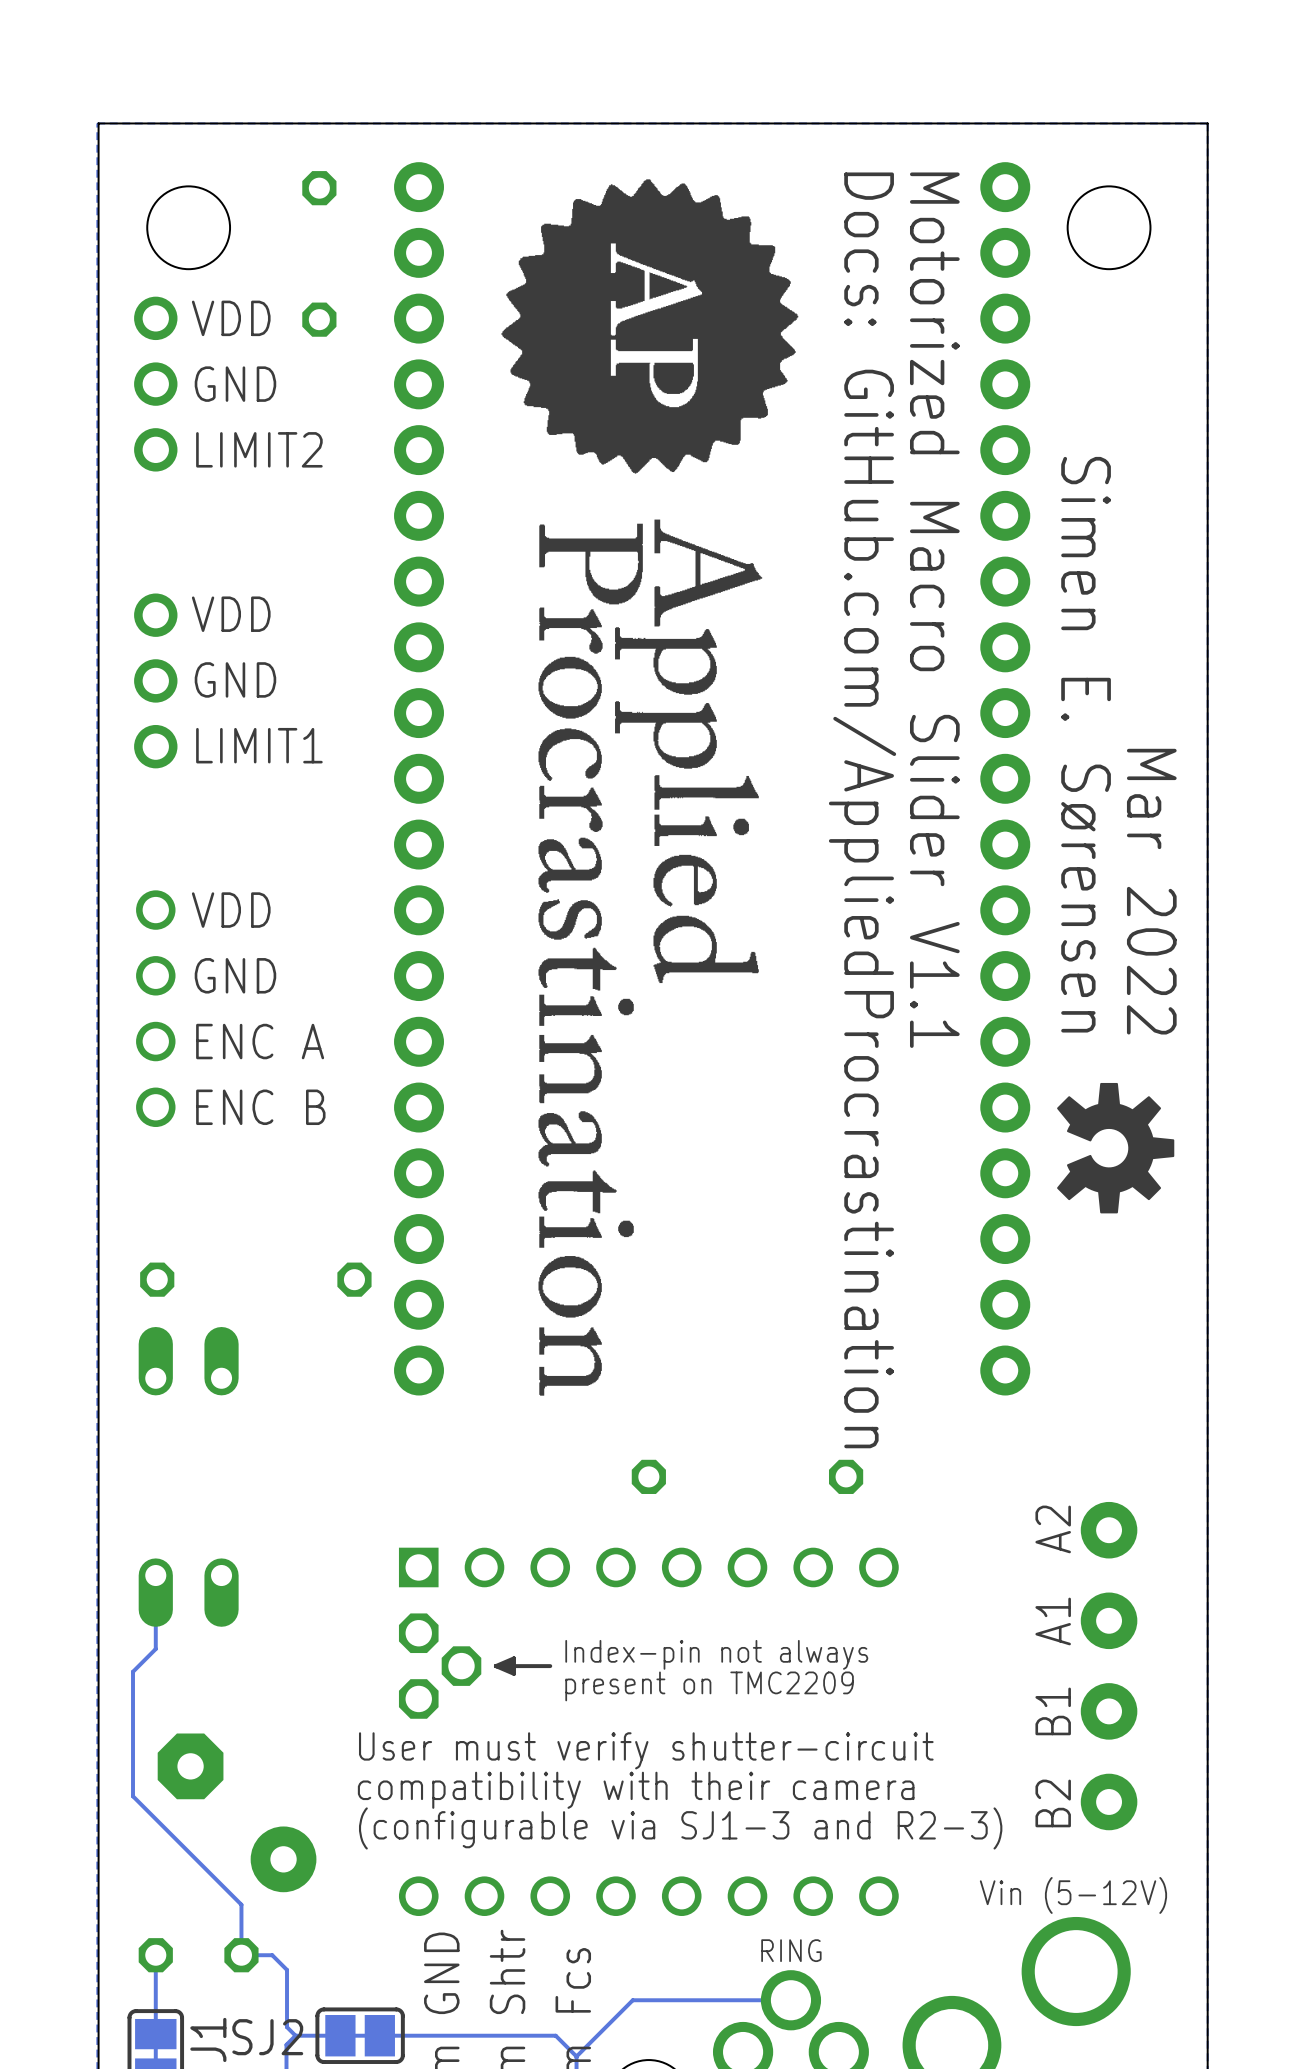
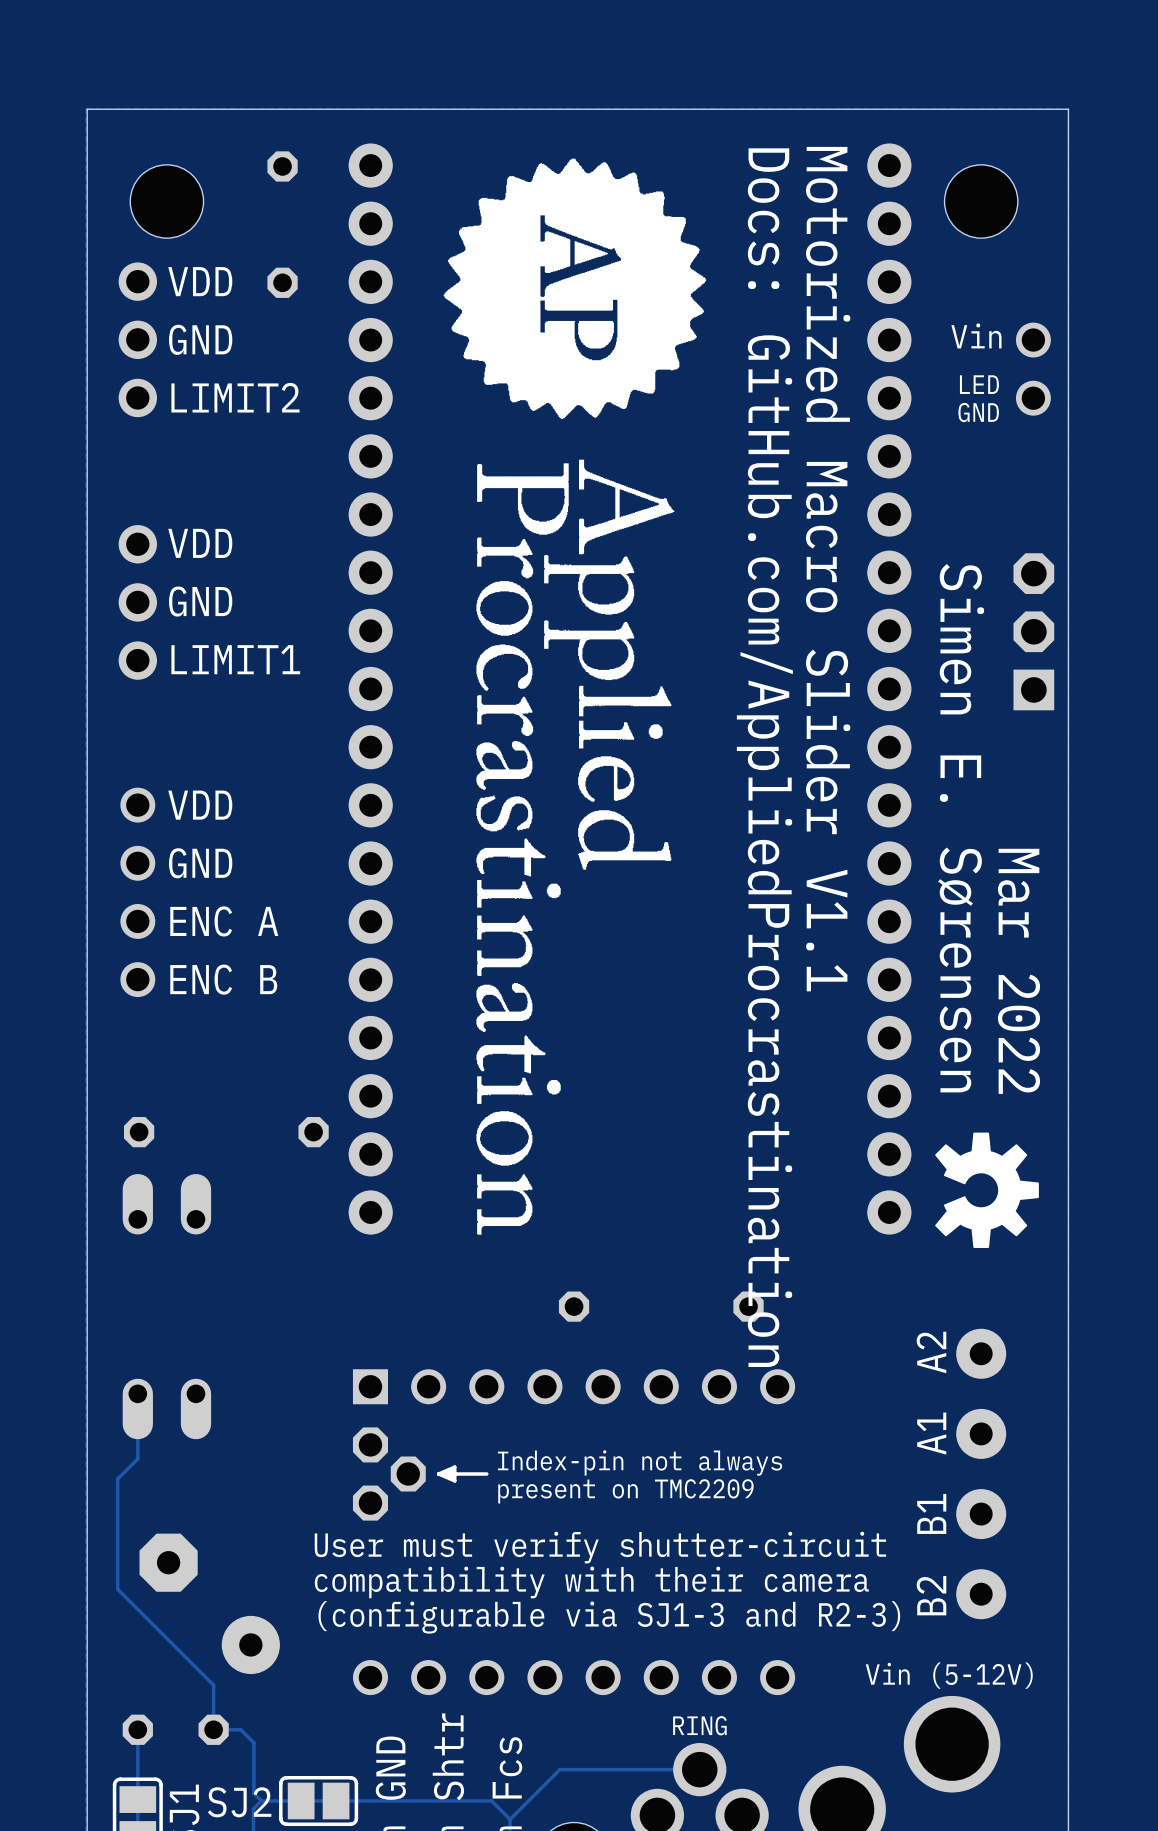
text: none -> Vin (976, 335)
part: none -> (1033, 369)
text: none -> LED (979, 384)
text: none -> GND (978, 412)
part: none -> (1033, 631)
text position: Simen E. Sørensen (1086, 744) -> Simen E. Sørensen (961, 828)
text position: Mar 2022 (1151, 891) -> Mar 2022 (1018, 971)
drawing position: (1115, 1148) -> (987, 1190)

